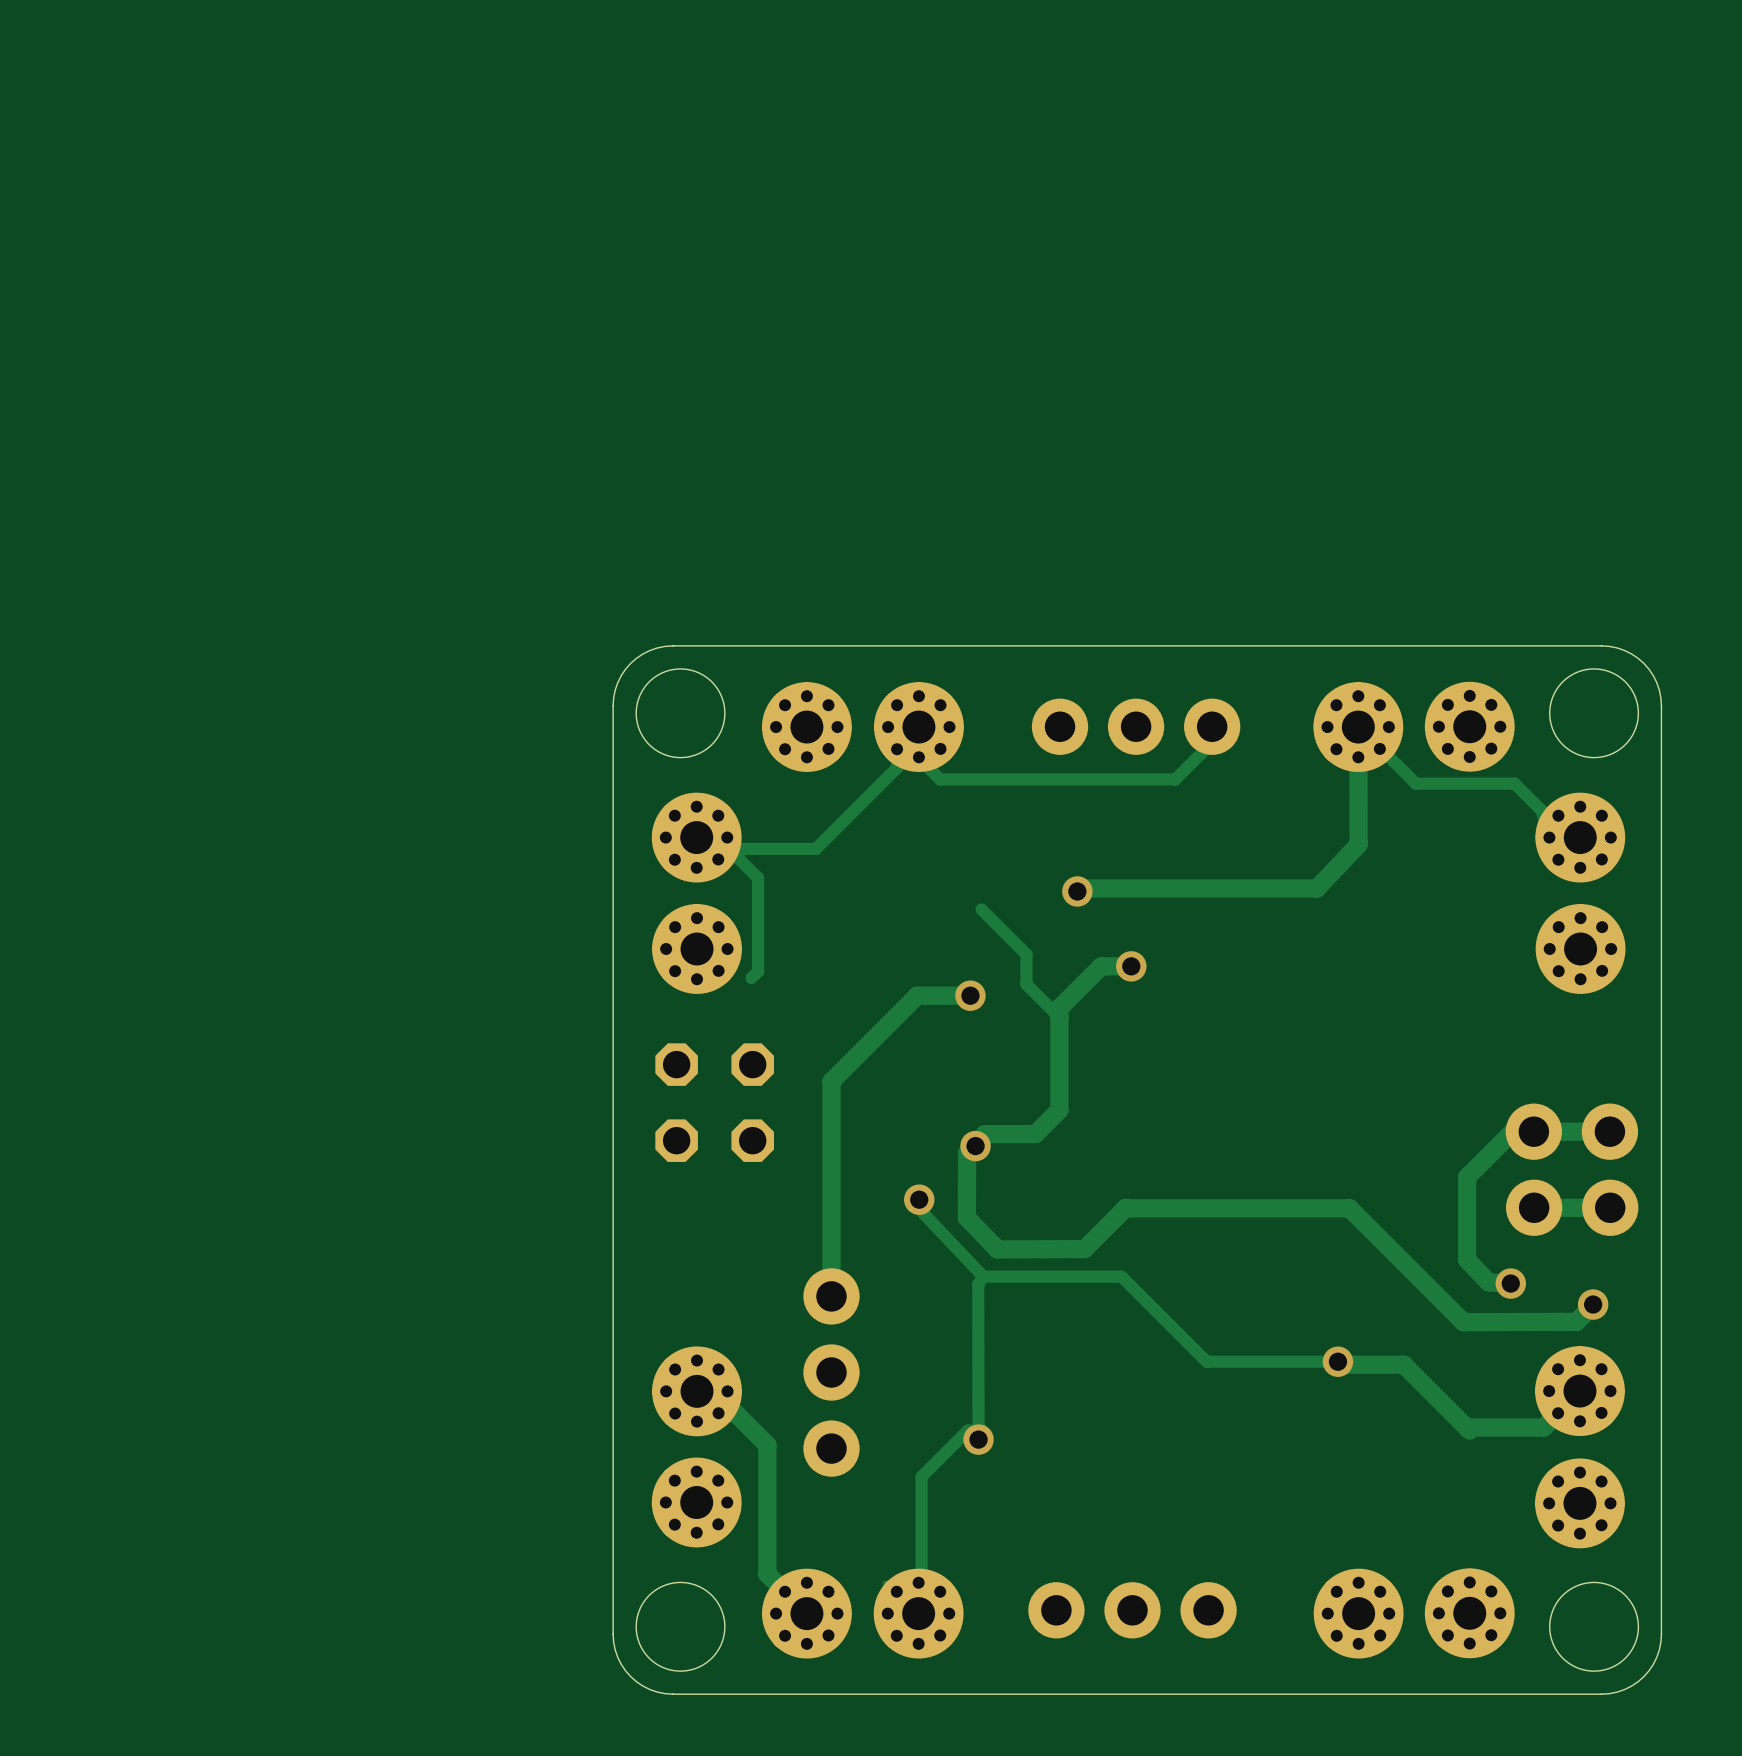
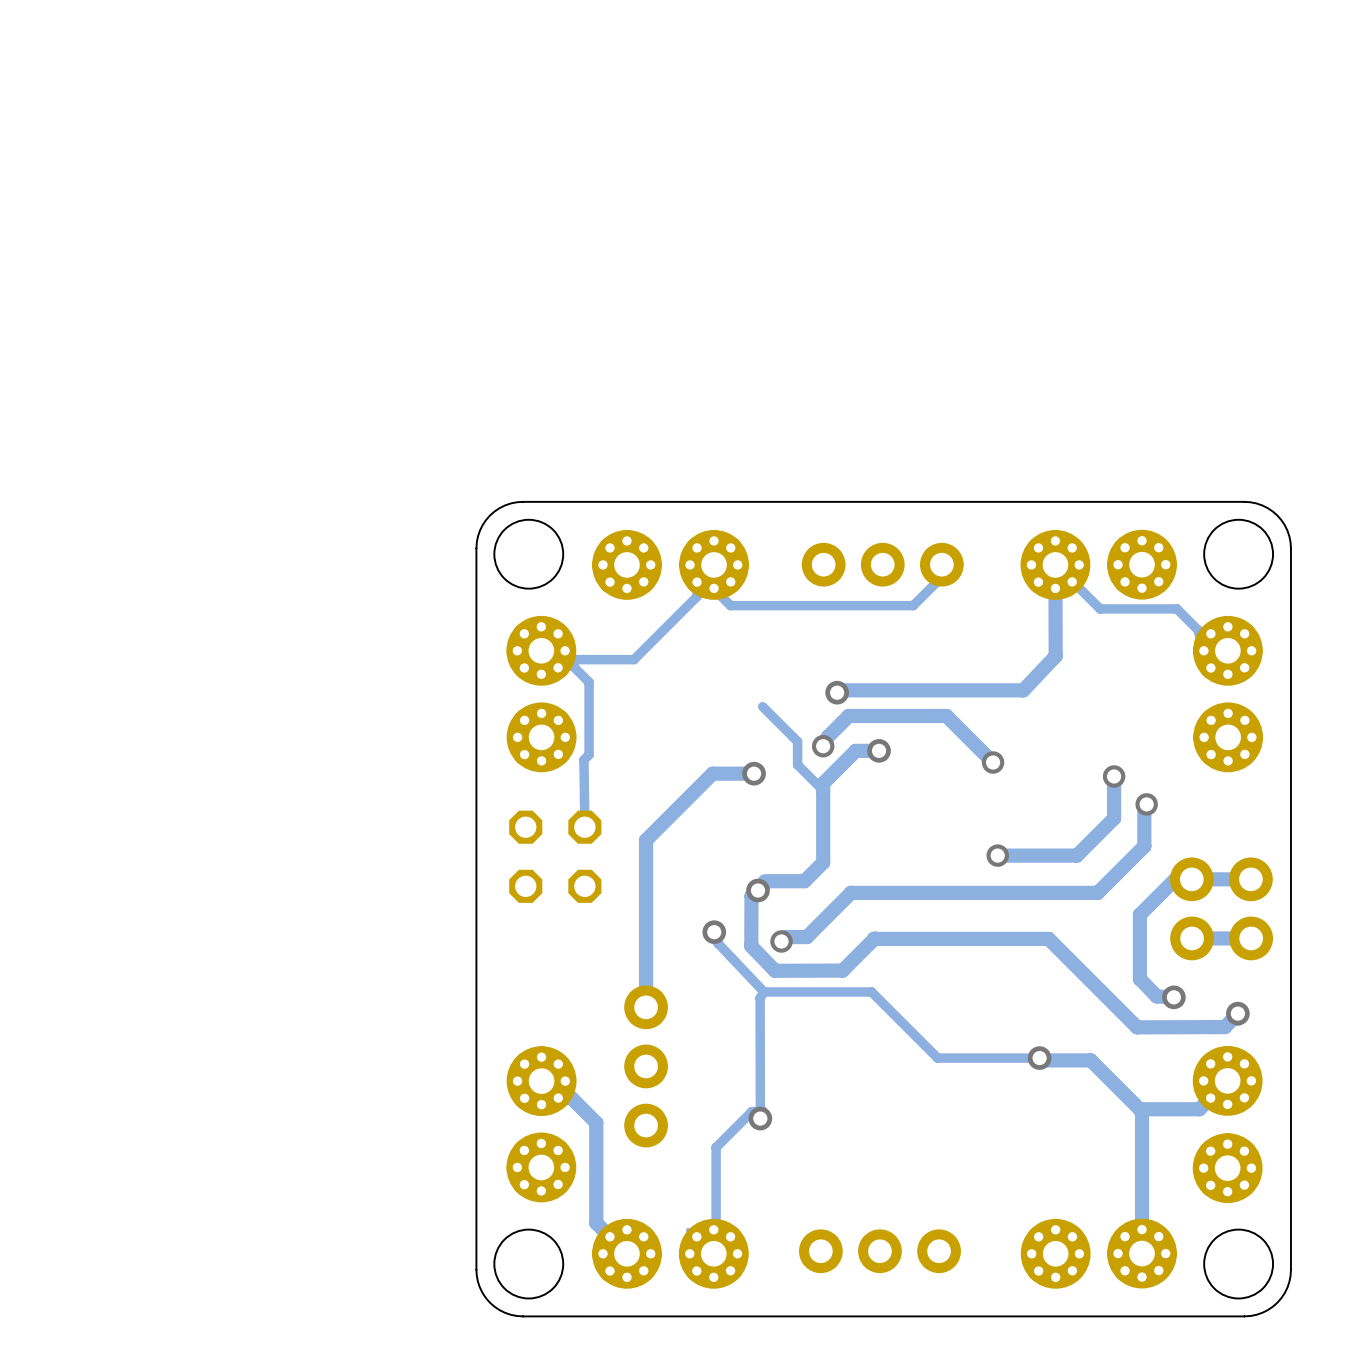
track: none -> (823, 746) (827, 736) (848, 715) (946, 715) (993, 762)
via: none -> (823, 746)
track: none -> (583, 759) (584, 827)
via: none -> (993, 762)
track: none -> (1114, 776) (1114, 818) (1076, 855) (997, 855)
via: none -> (1114, 776)
track: none -> (1146, 804) (1144, 802) (1144, 846) (1097, 892) (851, 892) (806, 937) (785, 937) (781, 941)
via: none -> (1146, 804)
via: none -> (997, 855)
via: none -> (781, 941)
track: none -> (1142, 1111) (1142, 1229)

